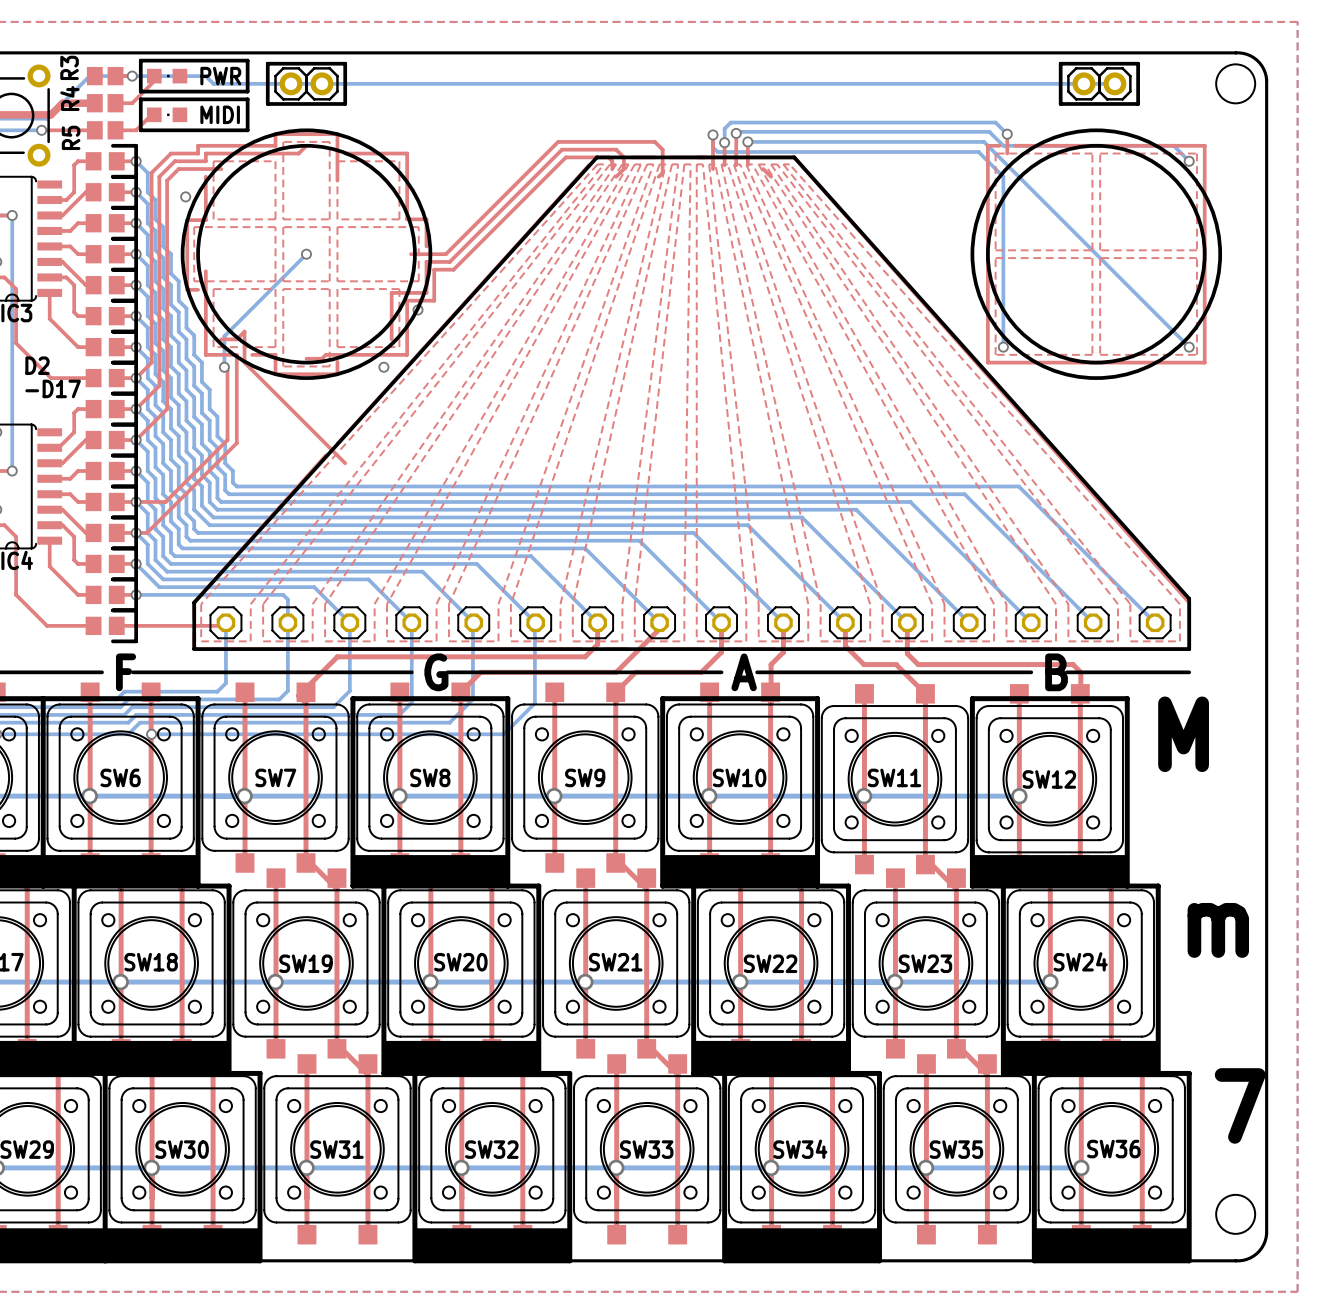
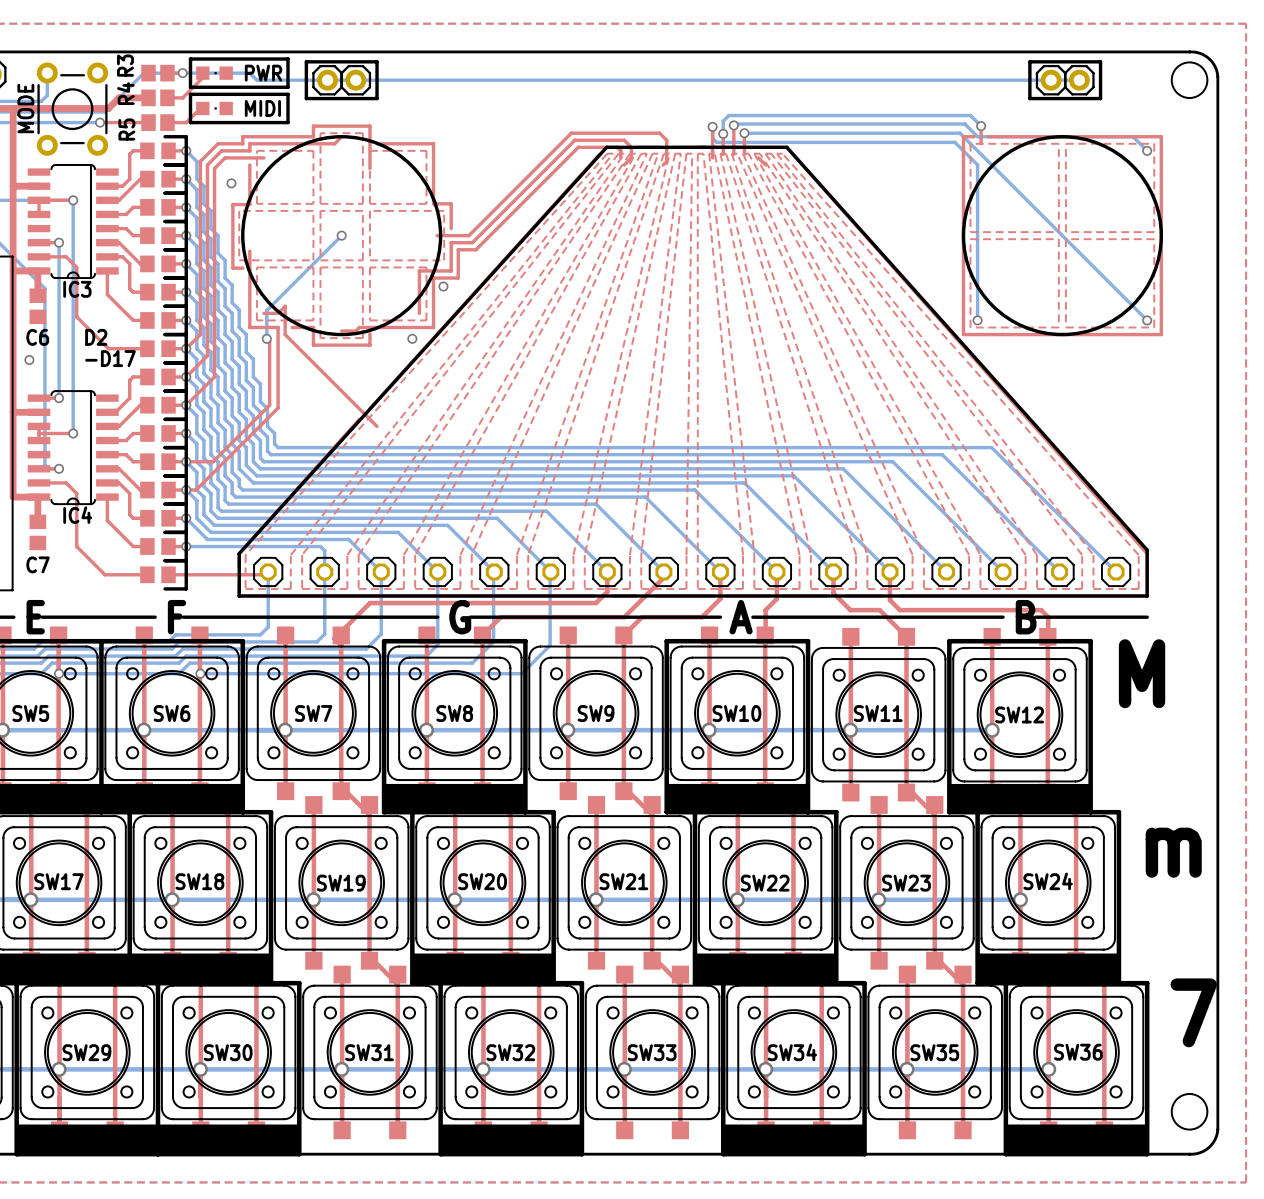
drawing: [180, 128, 433, 380] -> none
drawing: [970, 128, 1223, 380] -> none

